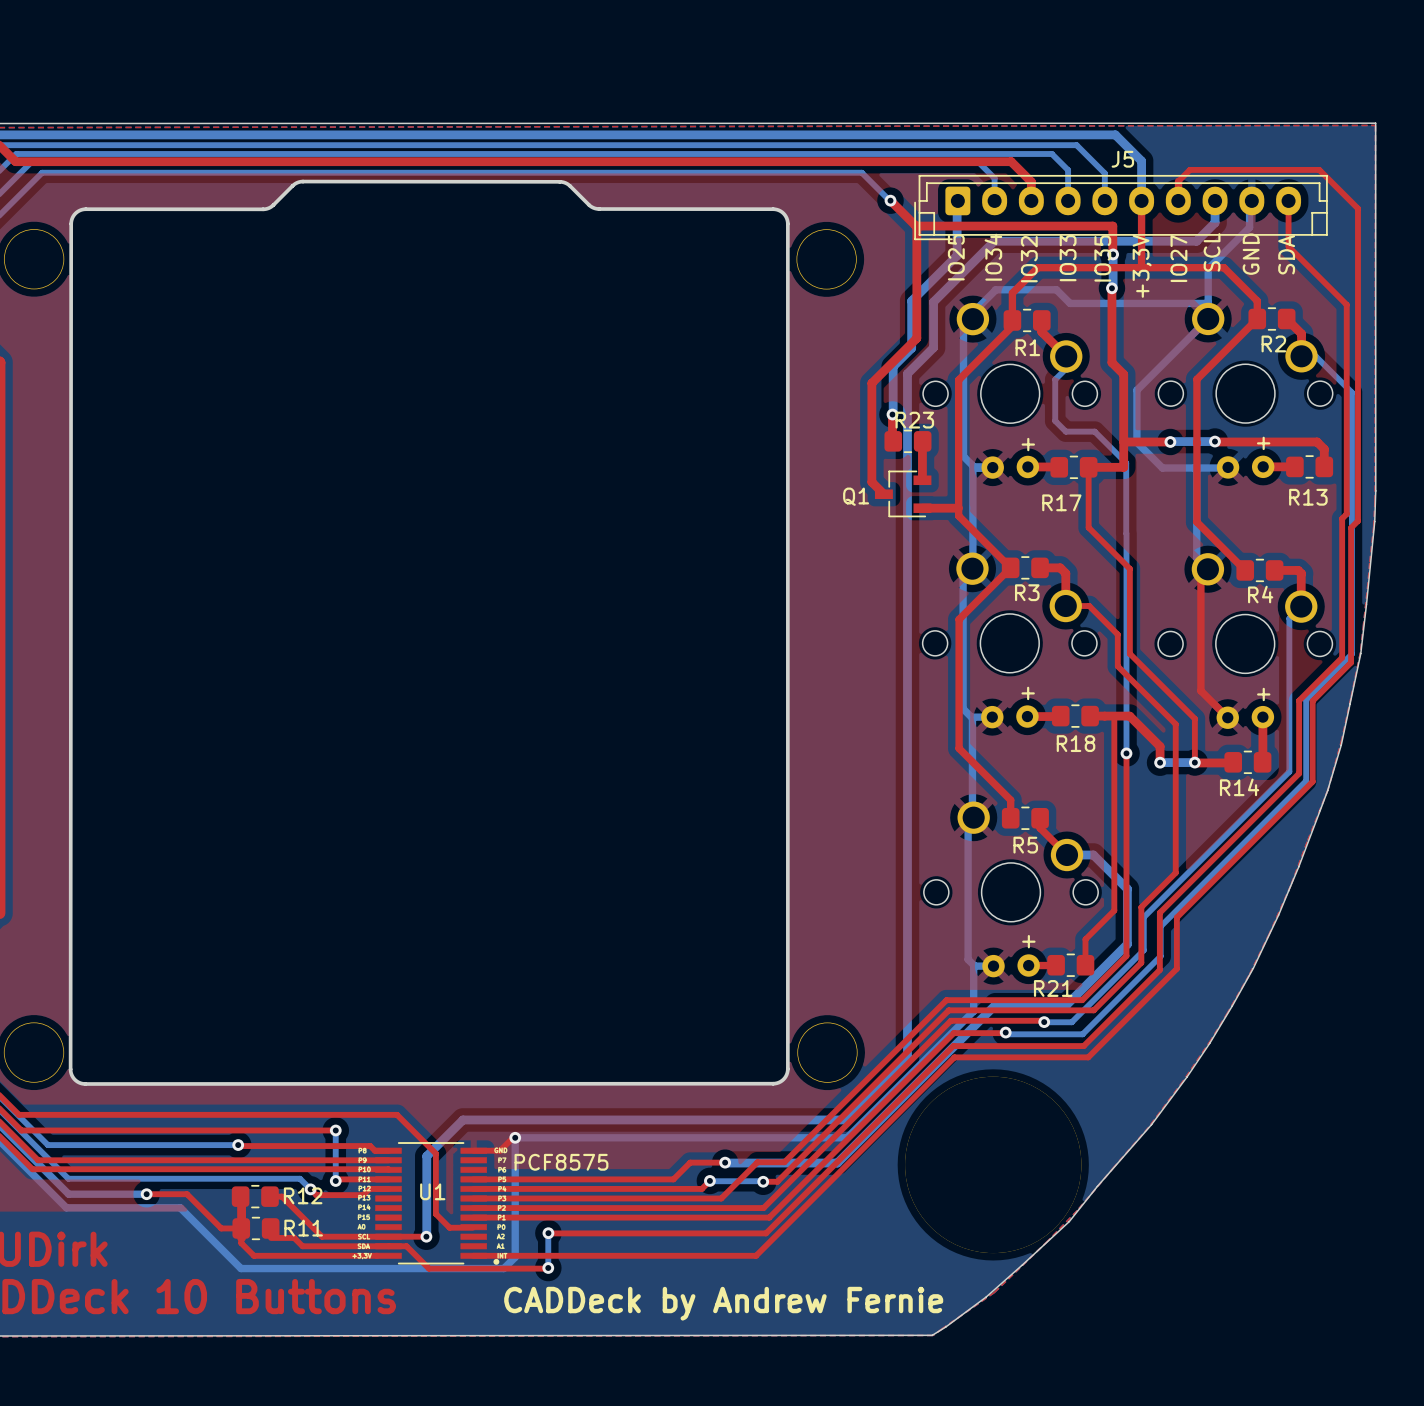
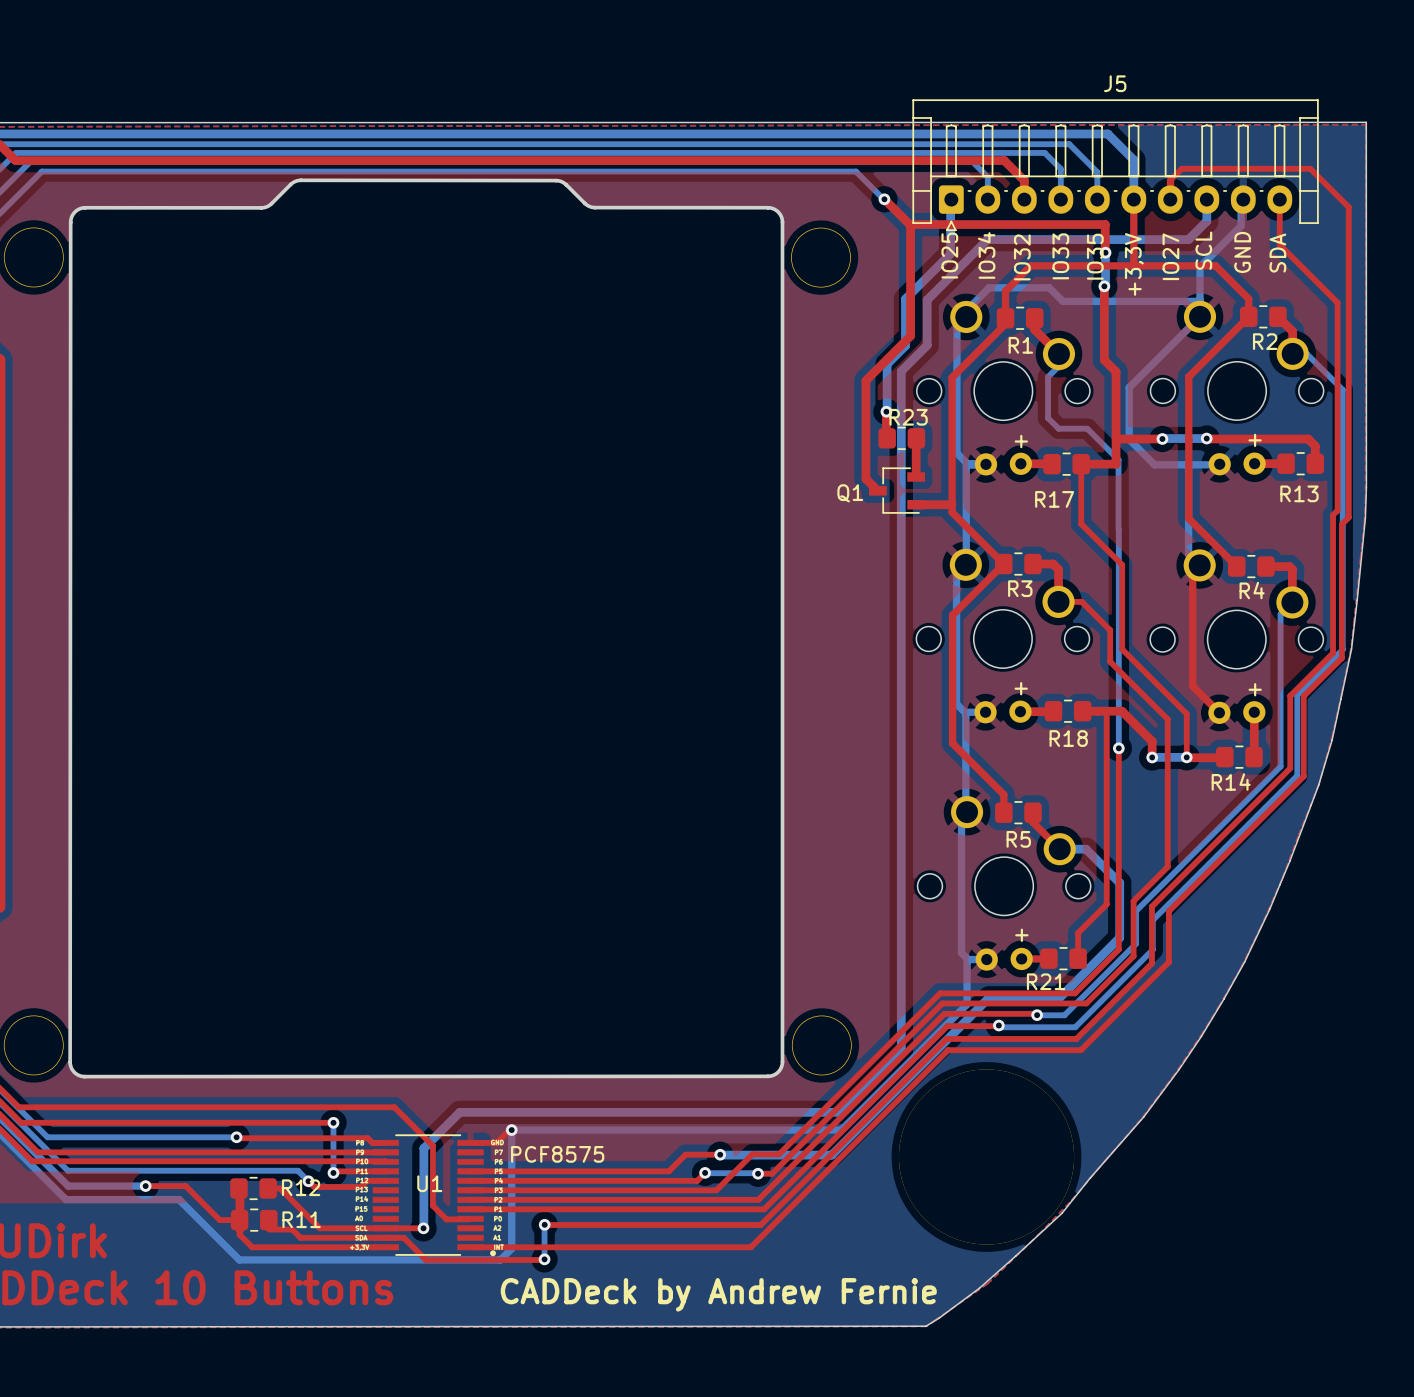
J5 name position: J5 (1122, 159) -> J5 (1115, 83)
J5 footprint: [914, 174, 1328, 241] -> [912, 99, 1319, 232]

